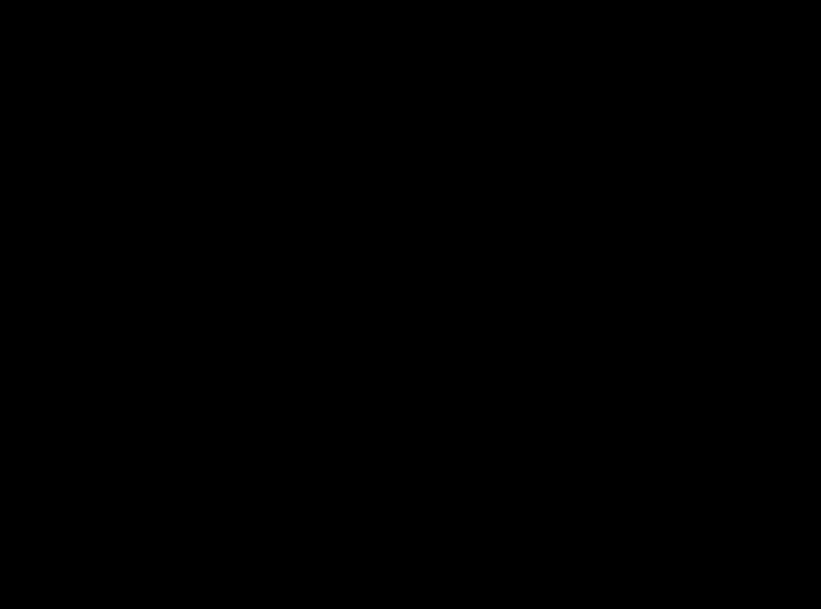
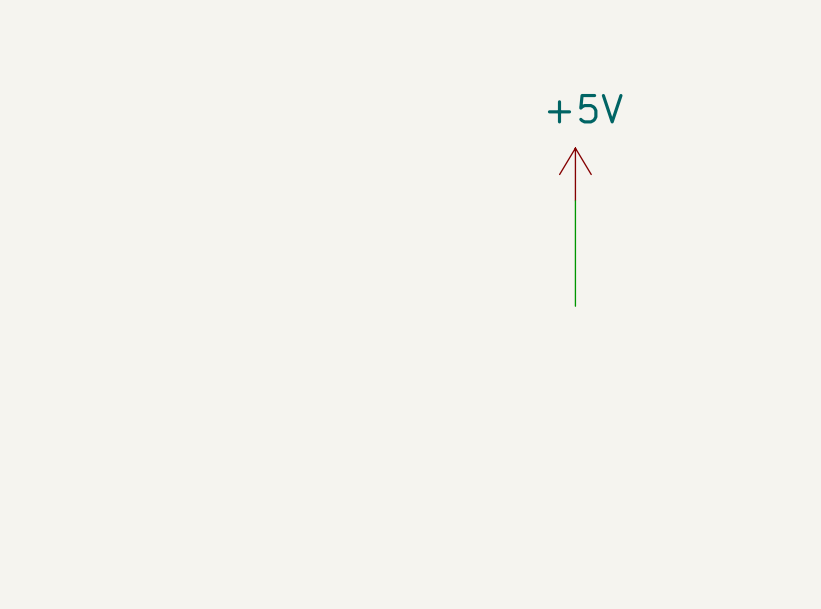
power symbol: none -> +5V (575, 174)
wire: none -> (575, 200) (575, 306)

